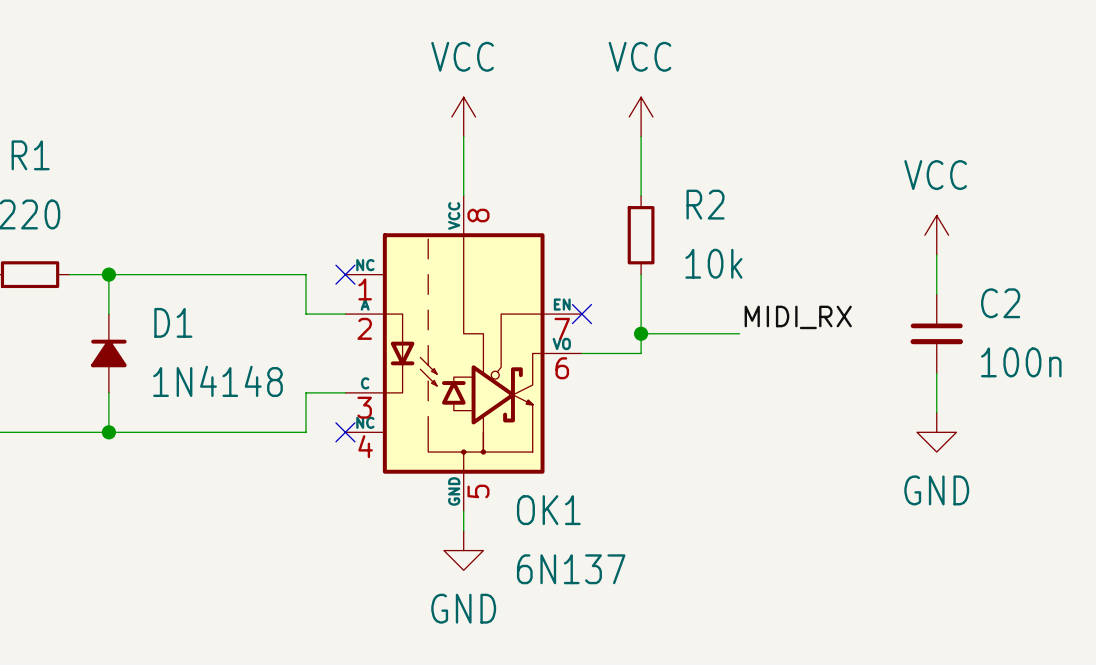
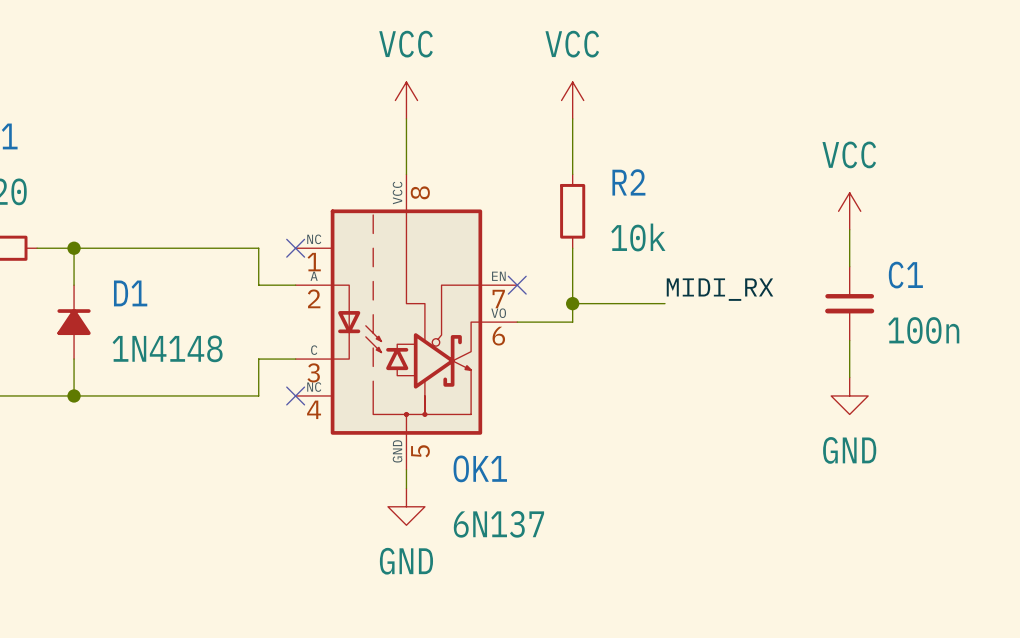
C2 name: C2 (1000, 303) -> C1 (905, 275)

